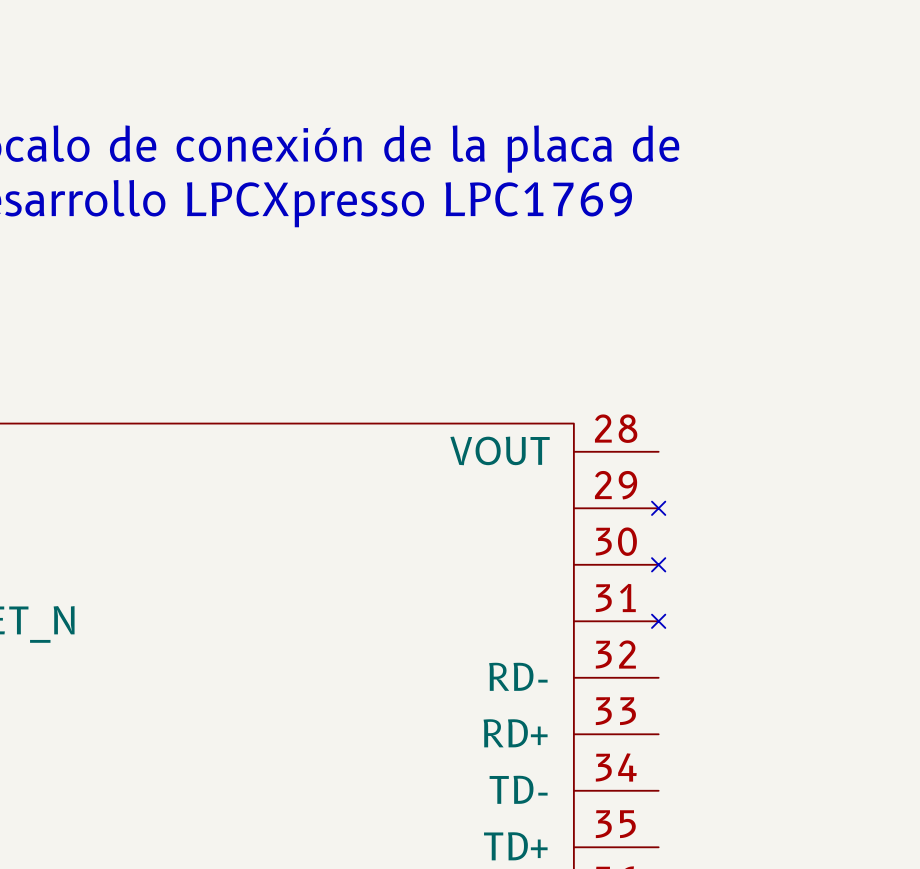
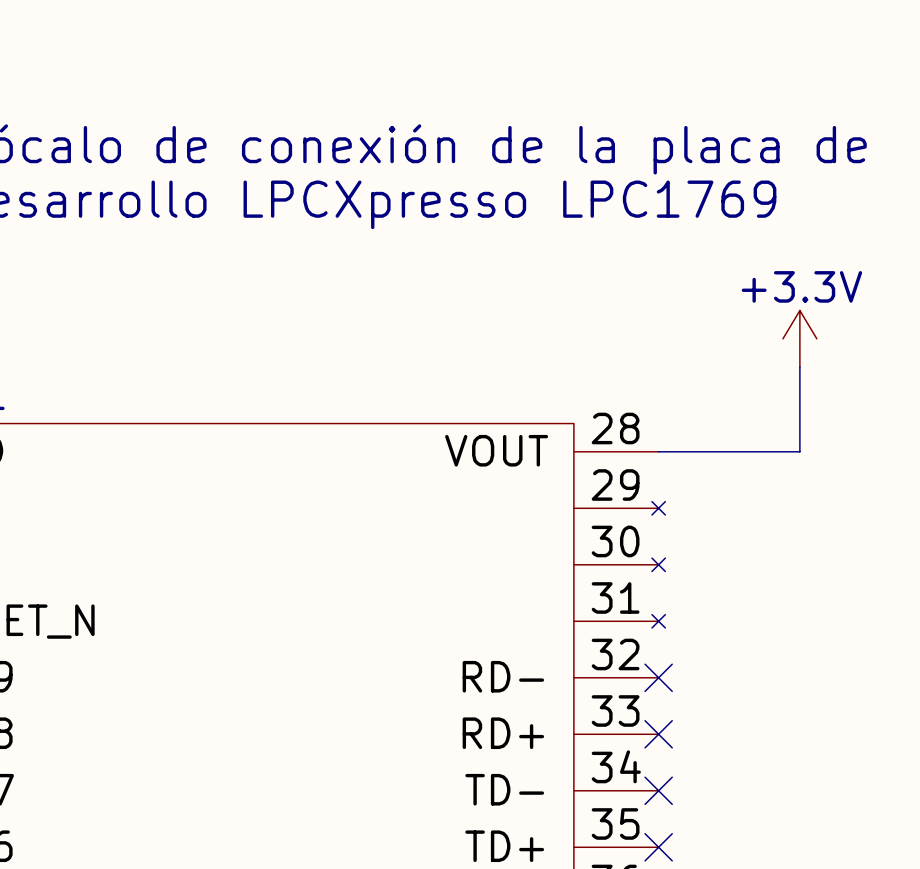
power symbol: none -> +3.3V (799, 338)
wire: none -> (799, 367) (799, 451) (658, 451)
no-connect mark: none -> (658, 677)
no-connect mark: none -> (658, 734)
no-connect mark: none -> (658, 790)
no-connect mark: none -> (658, 847)

